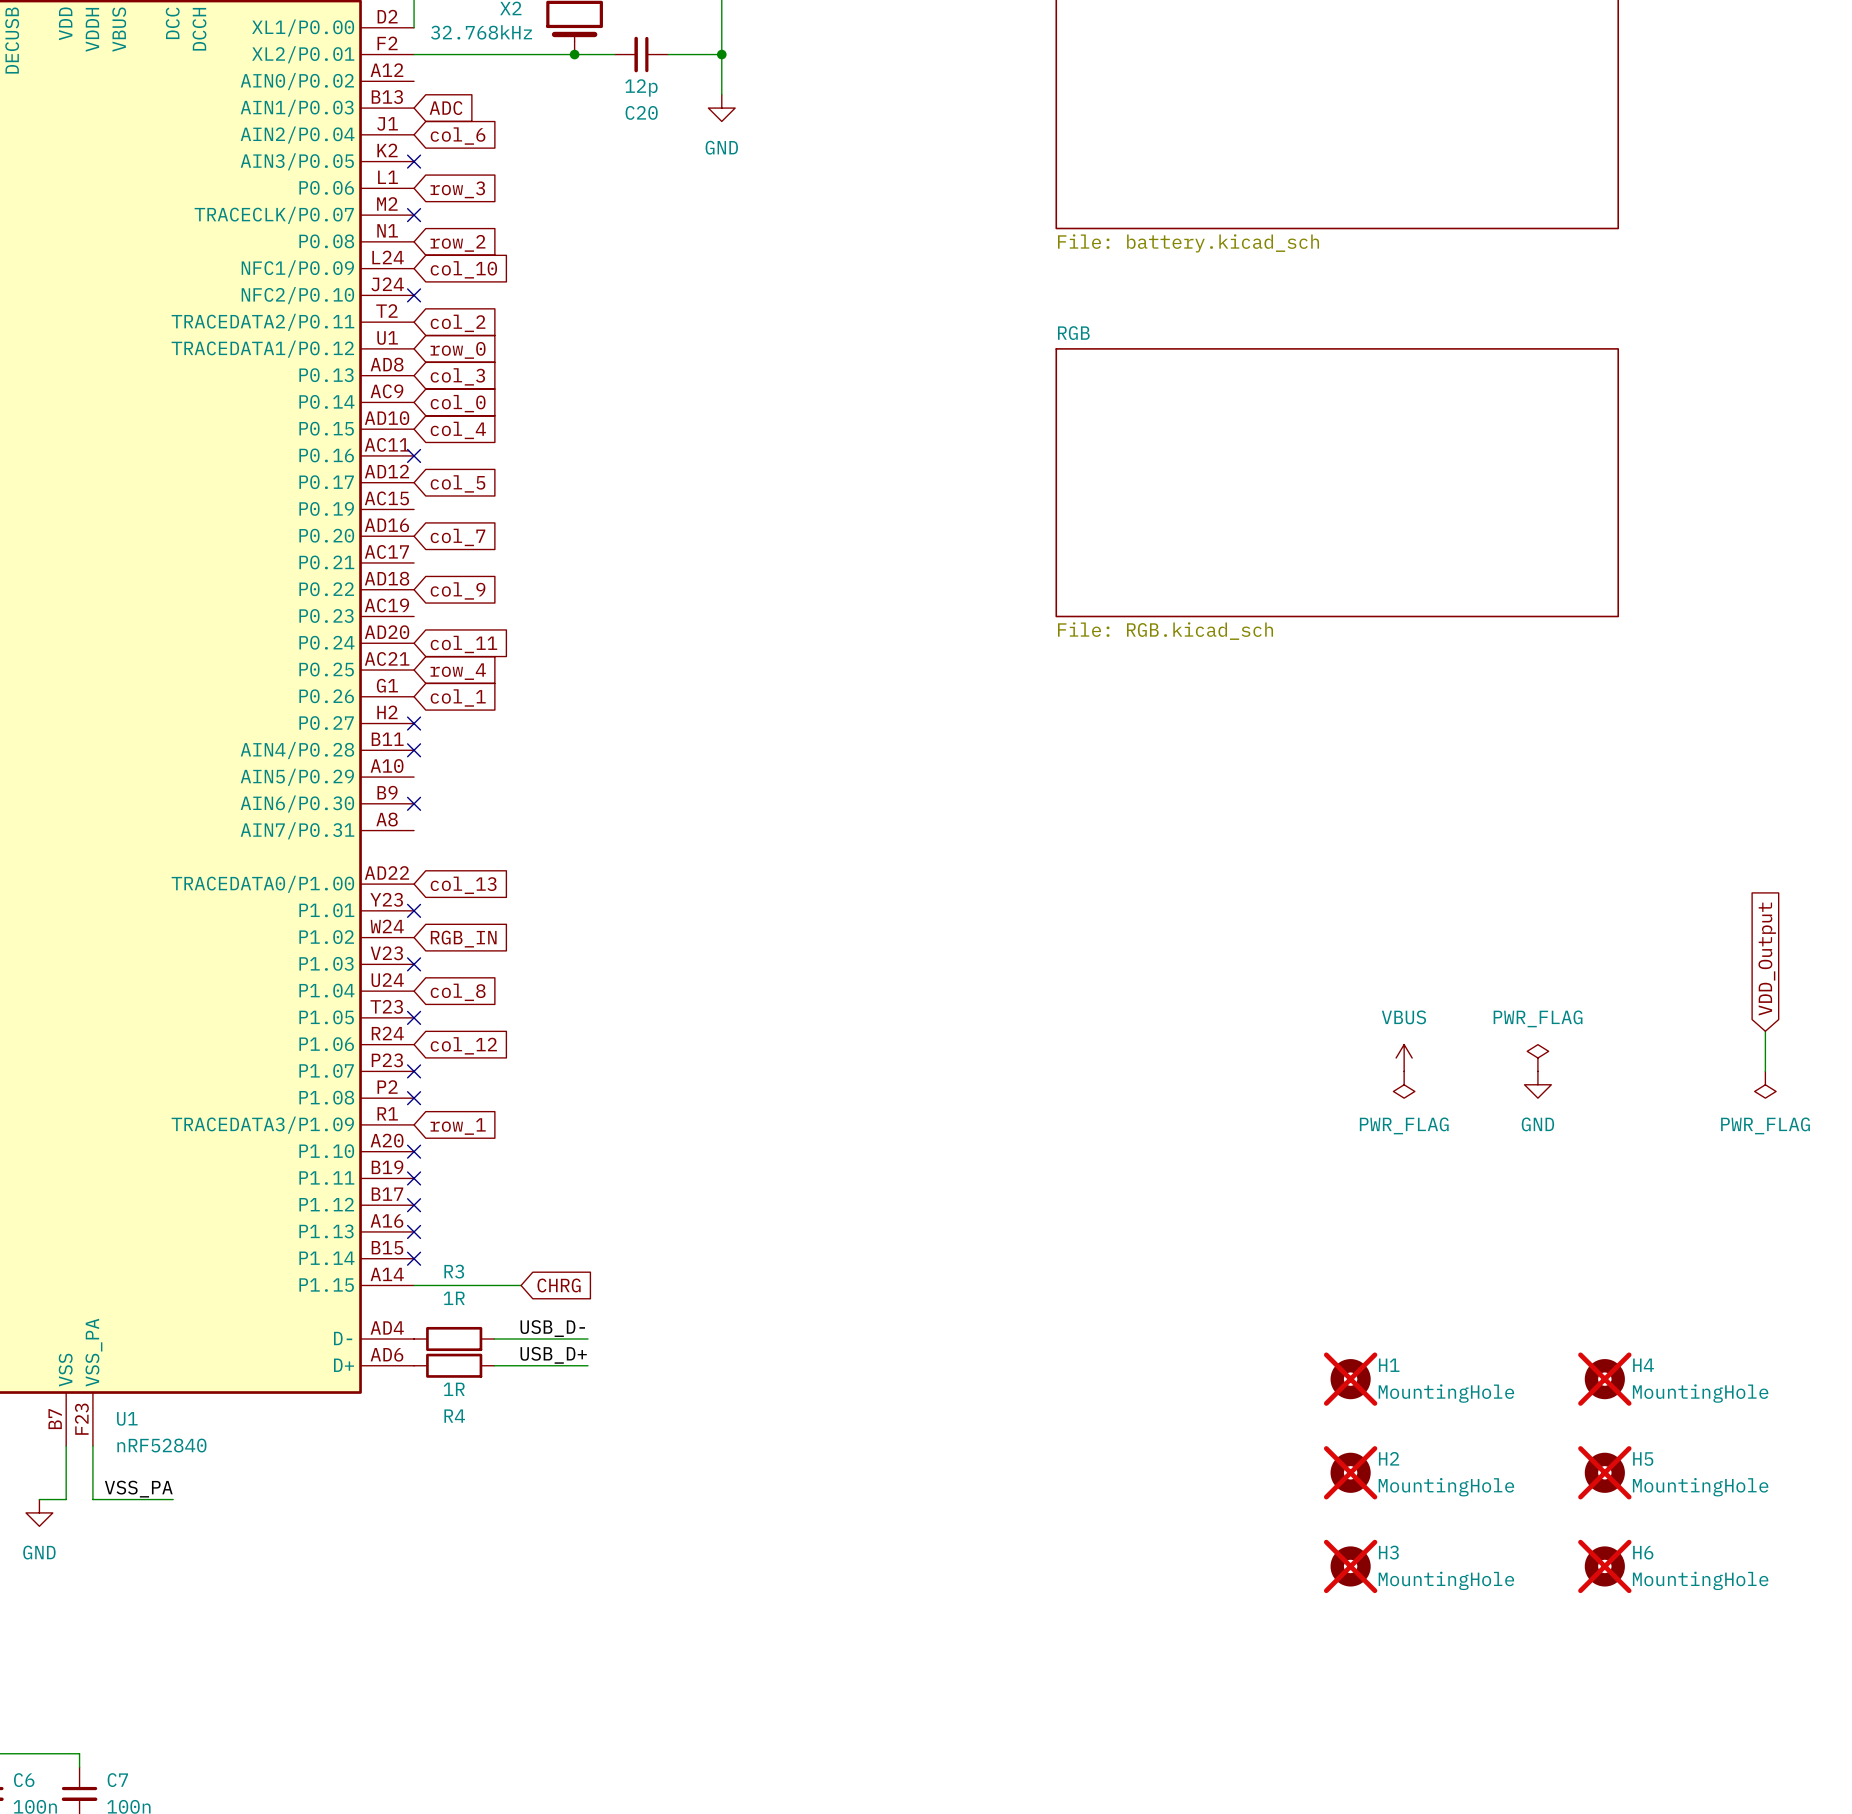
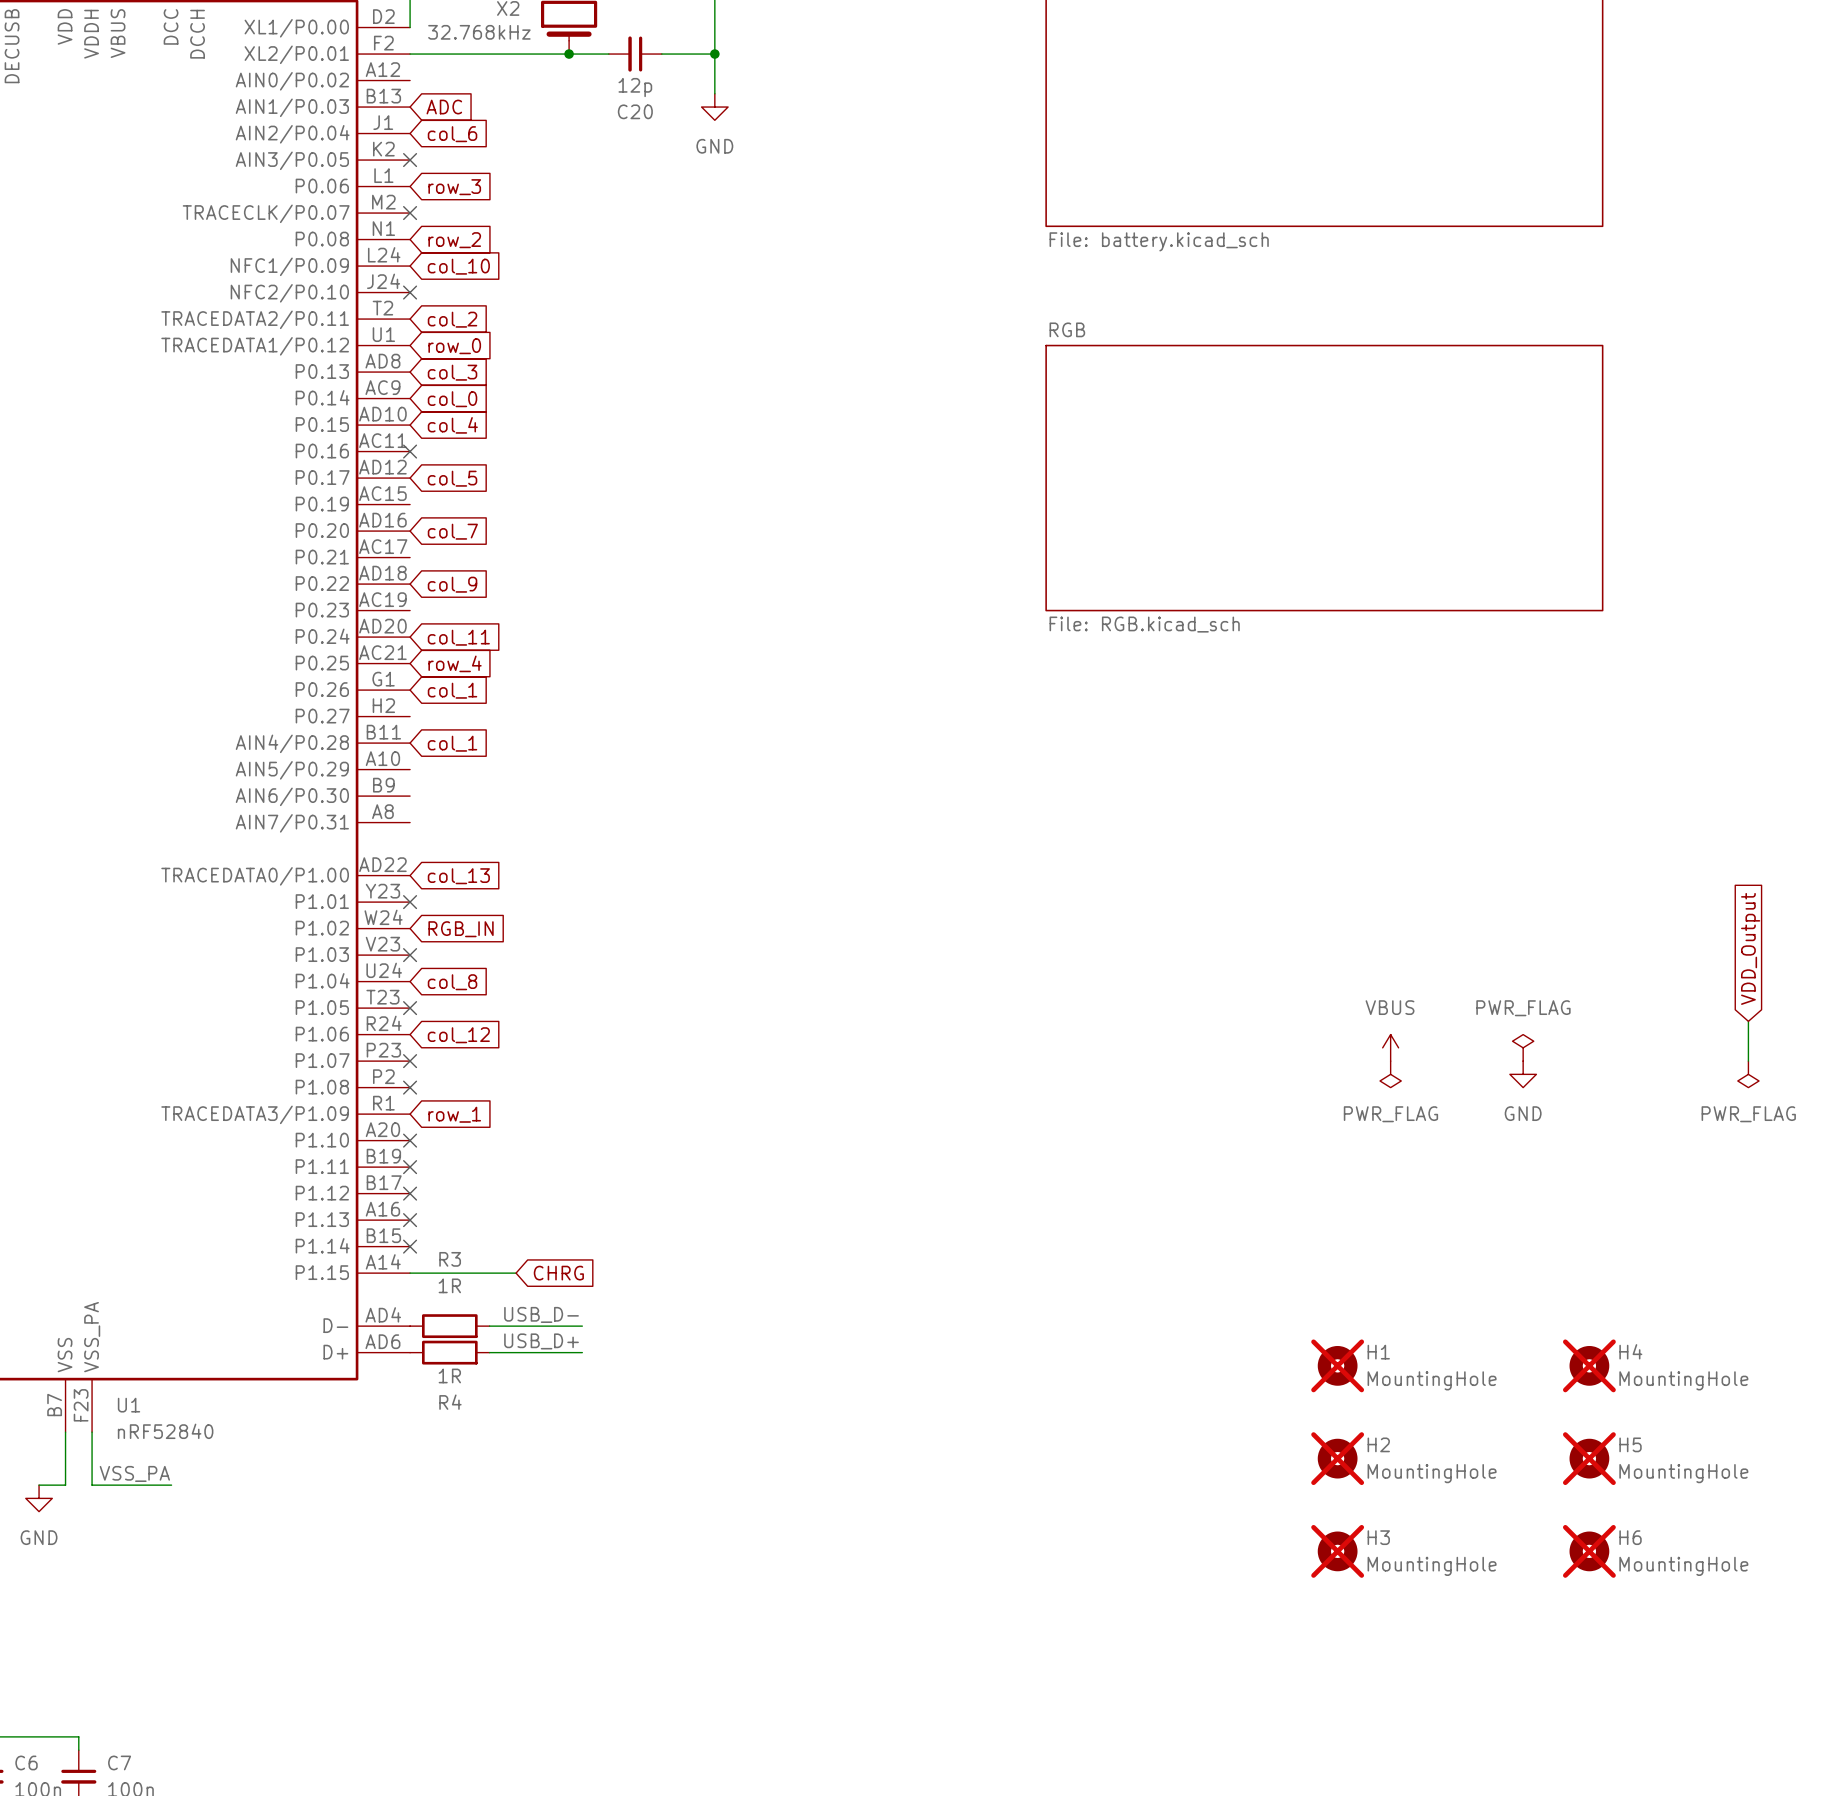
no-connect mark: (414, 723) -> none
no-connect mark: (414, 750) -> none
global label: none -> col_1 (452, 743)
no-connect mark: (414, 803) -> none

